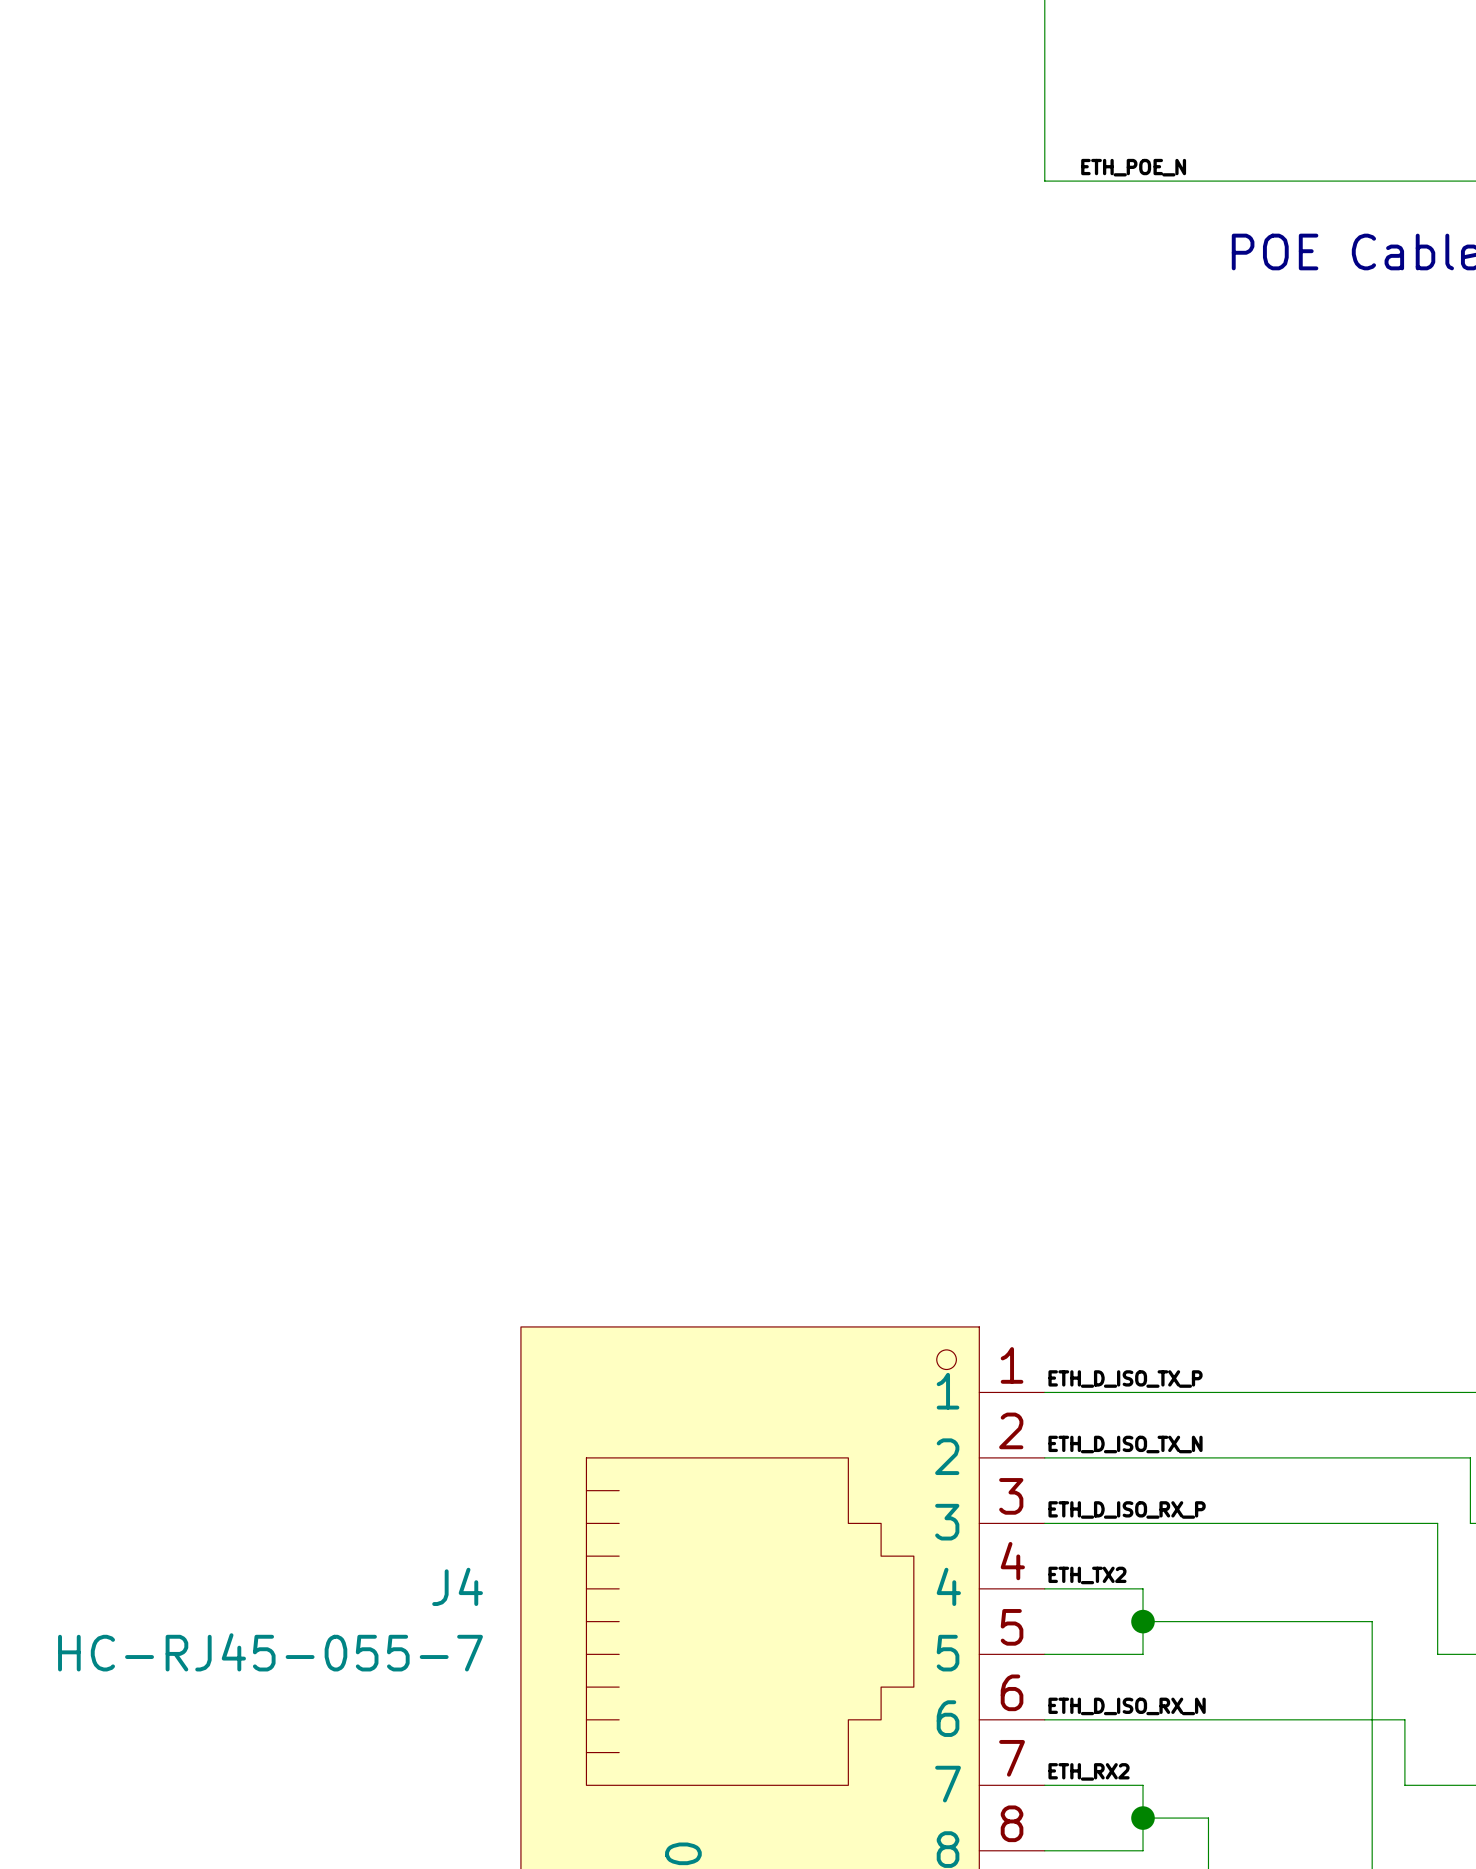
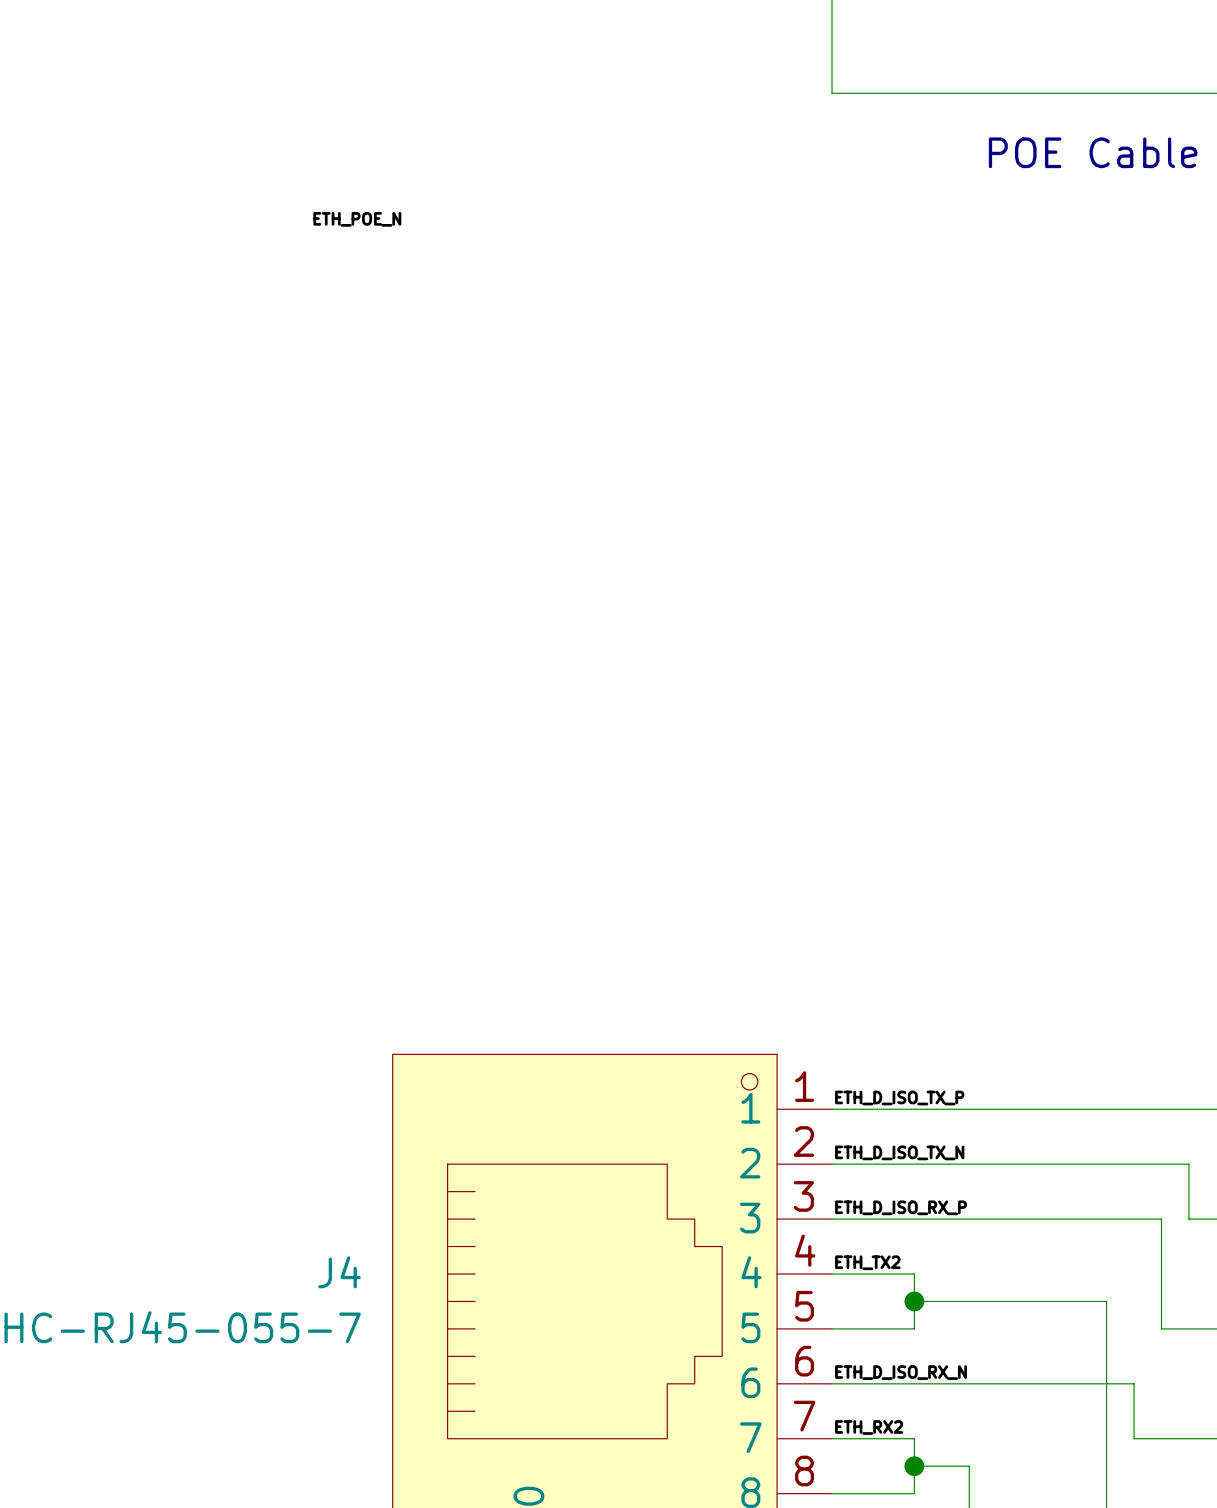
label: ETH_POE_N (1133, 167) -> none
label: none -> ETH_POE_N (357, 219)

